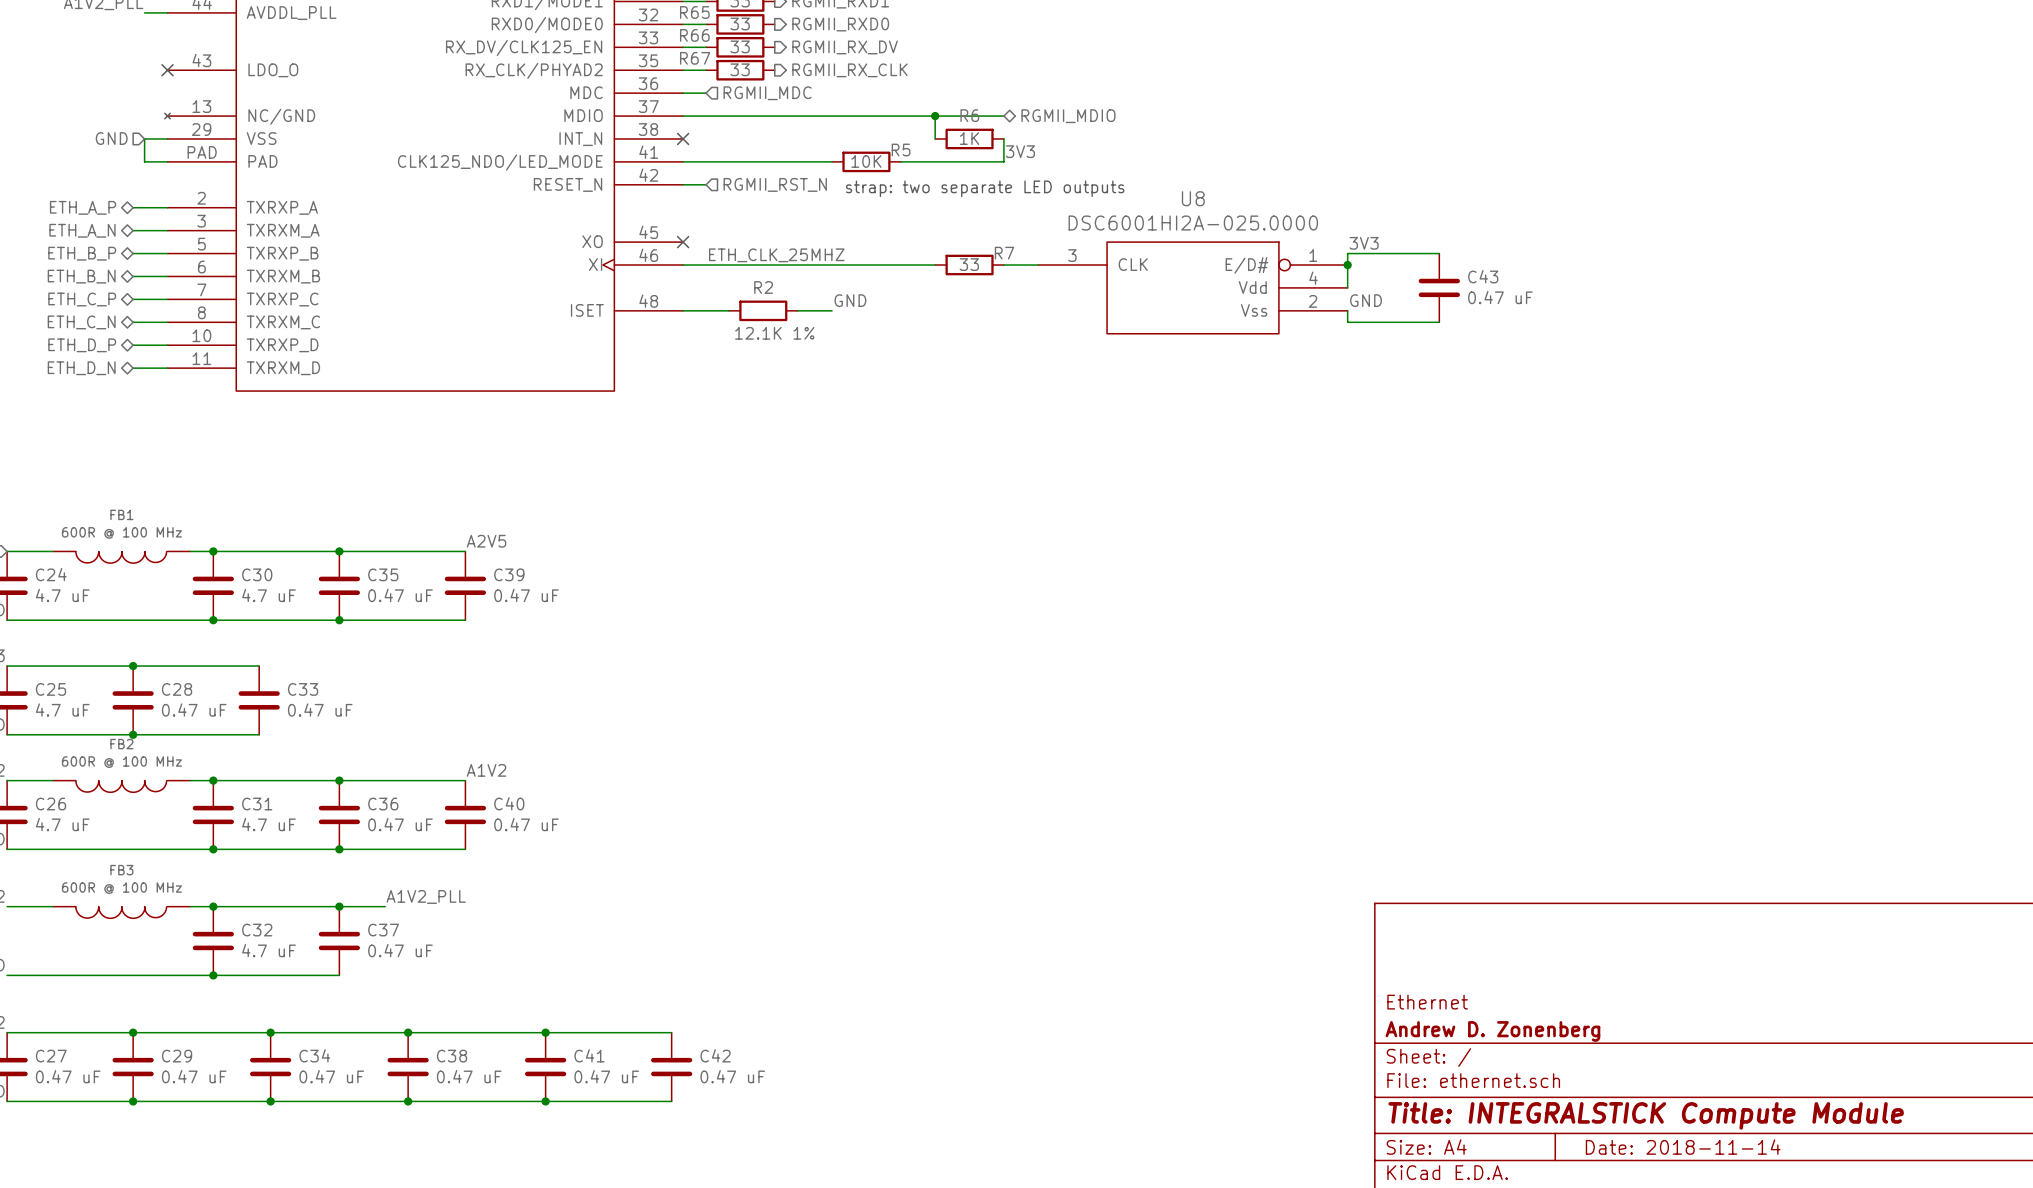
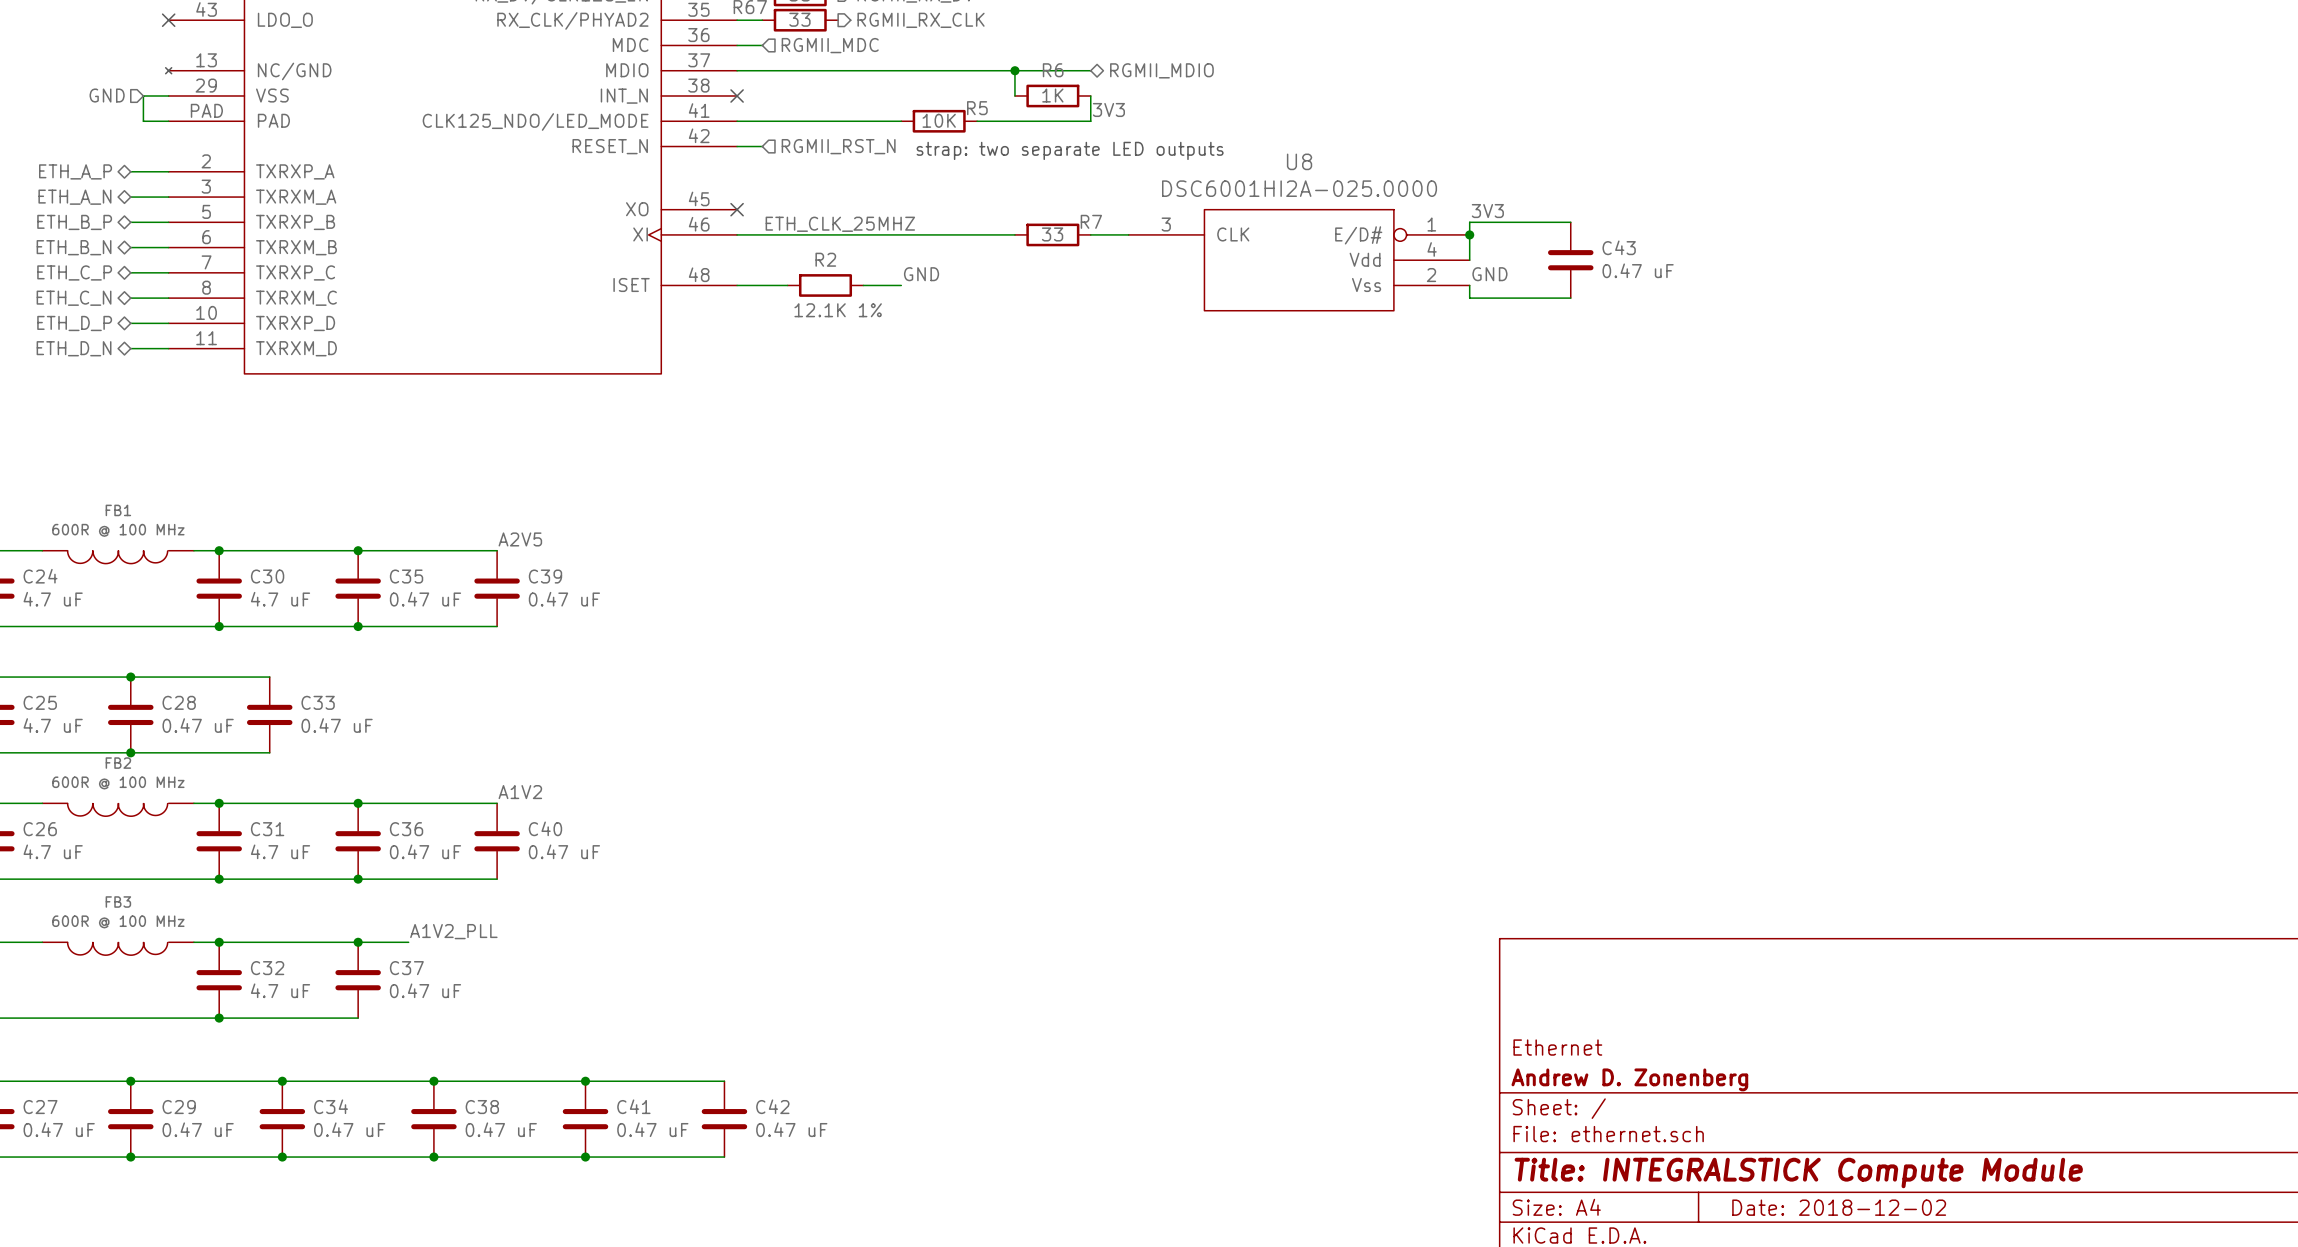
title block: Date: 2018-11-14 (1683, 1147) -> Date: 2018-12-02 (1839, 1207)

